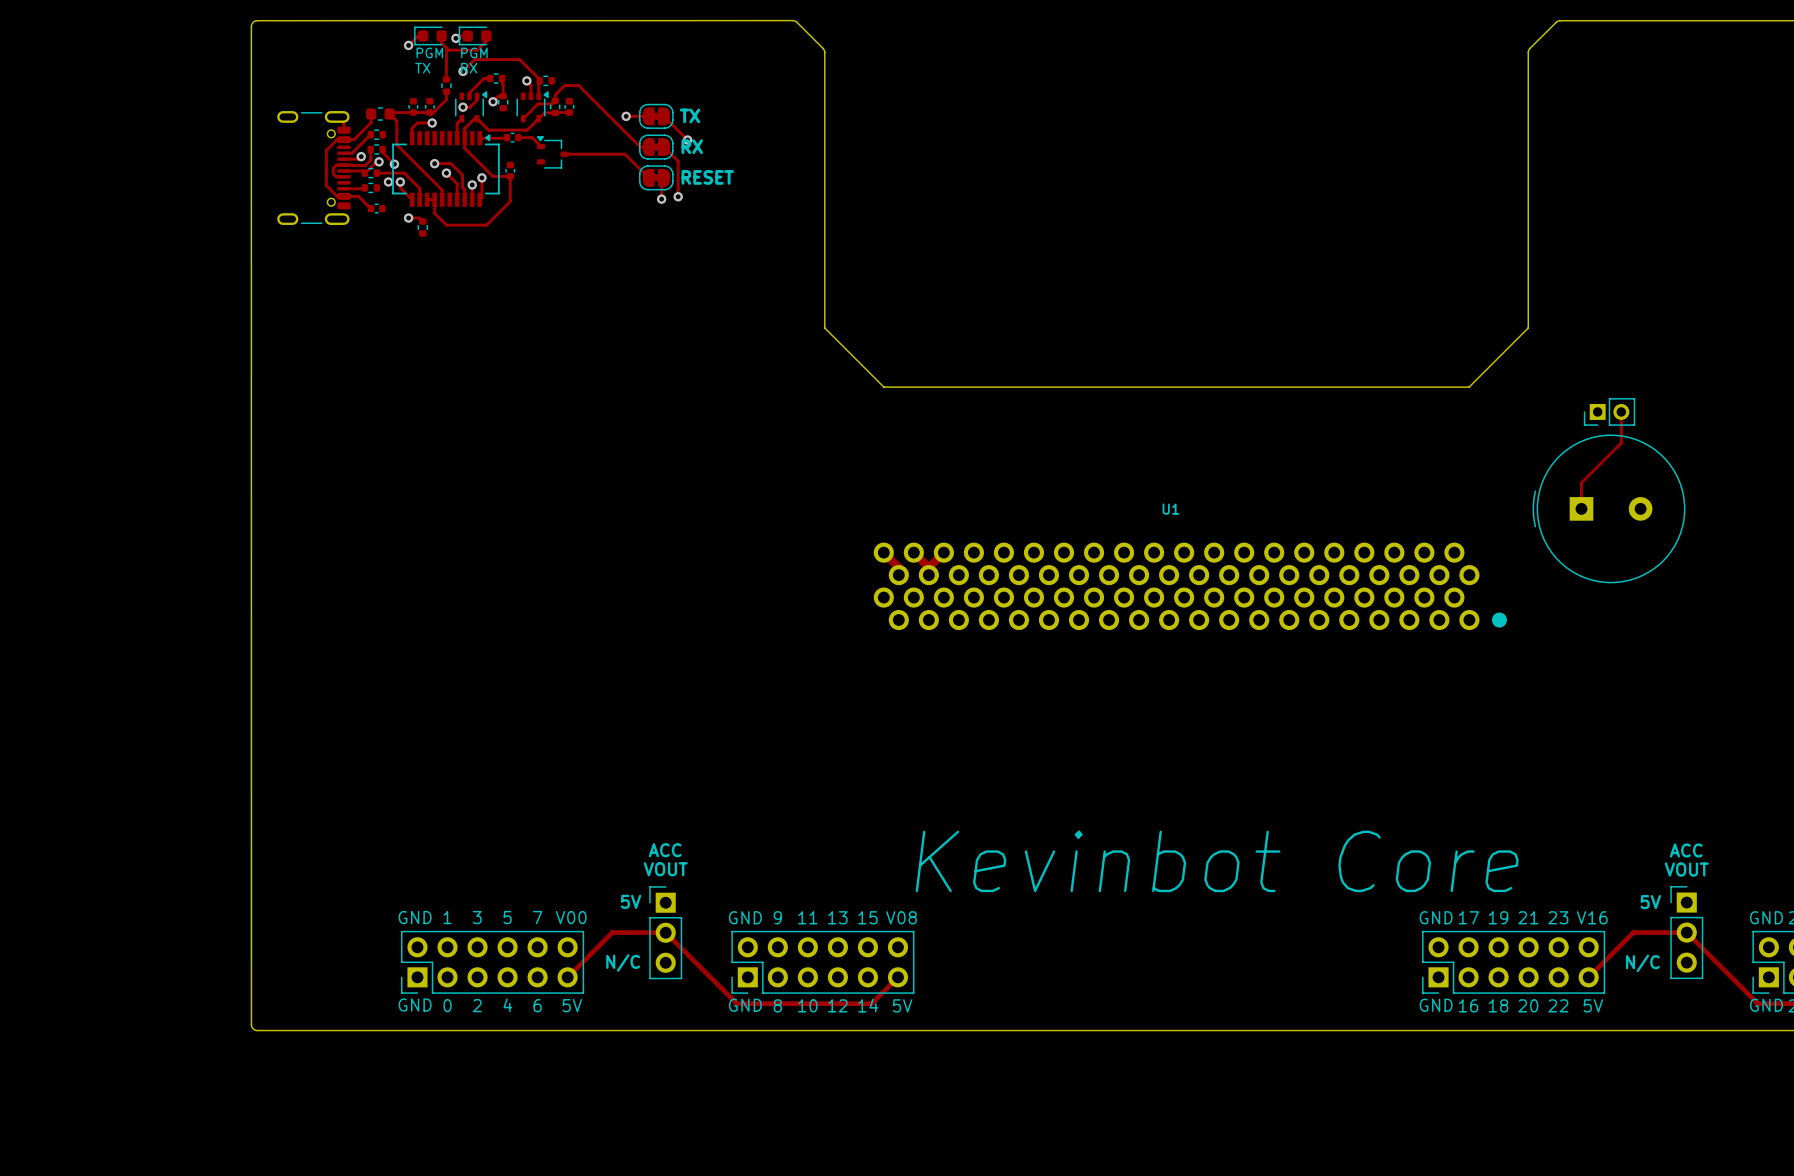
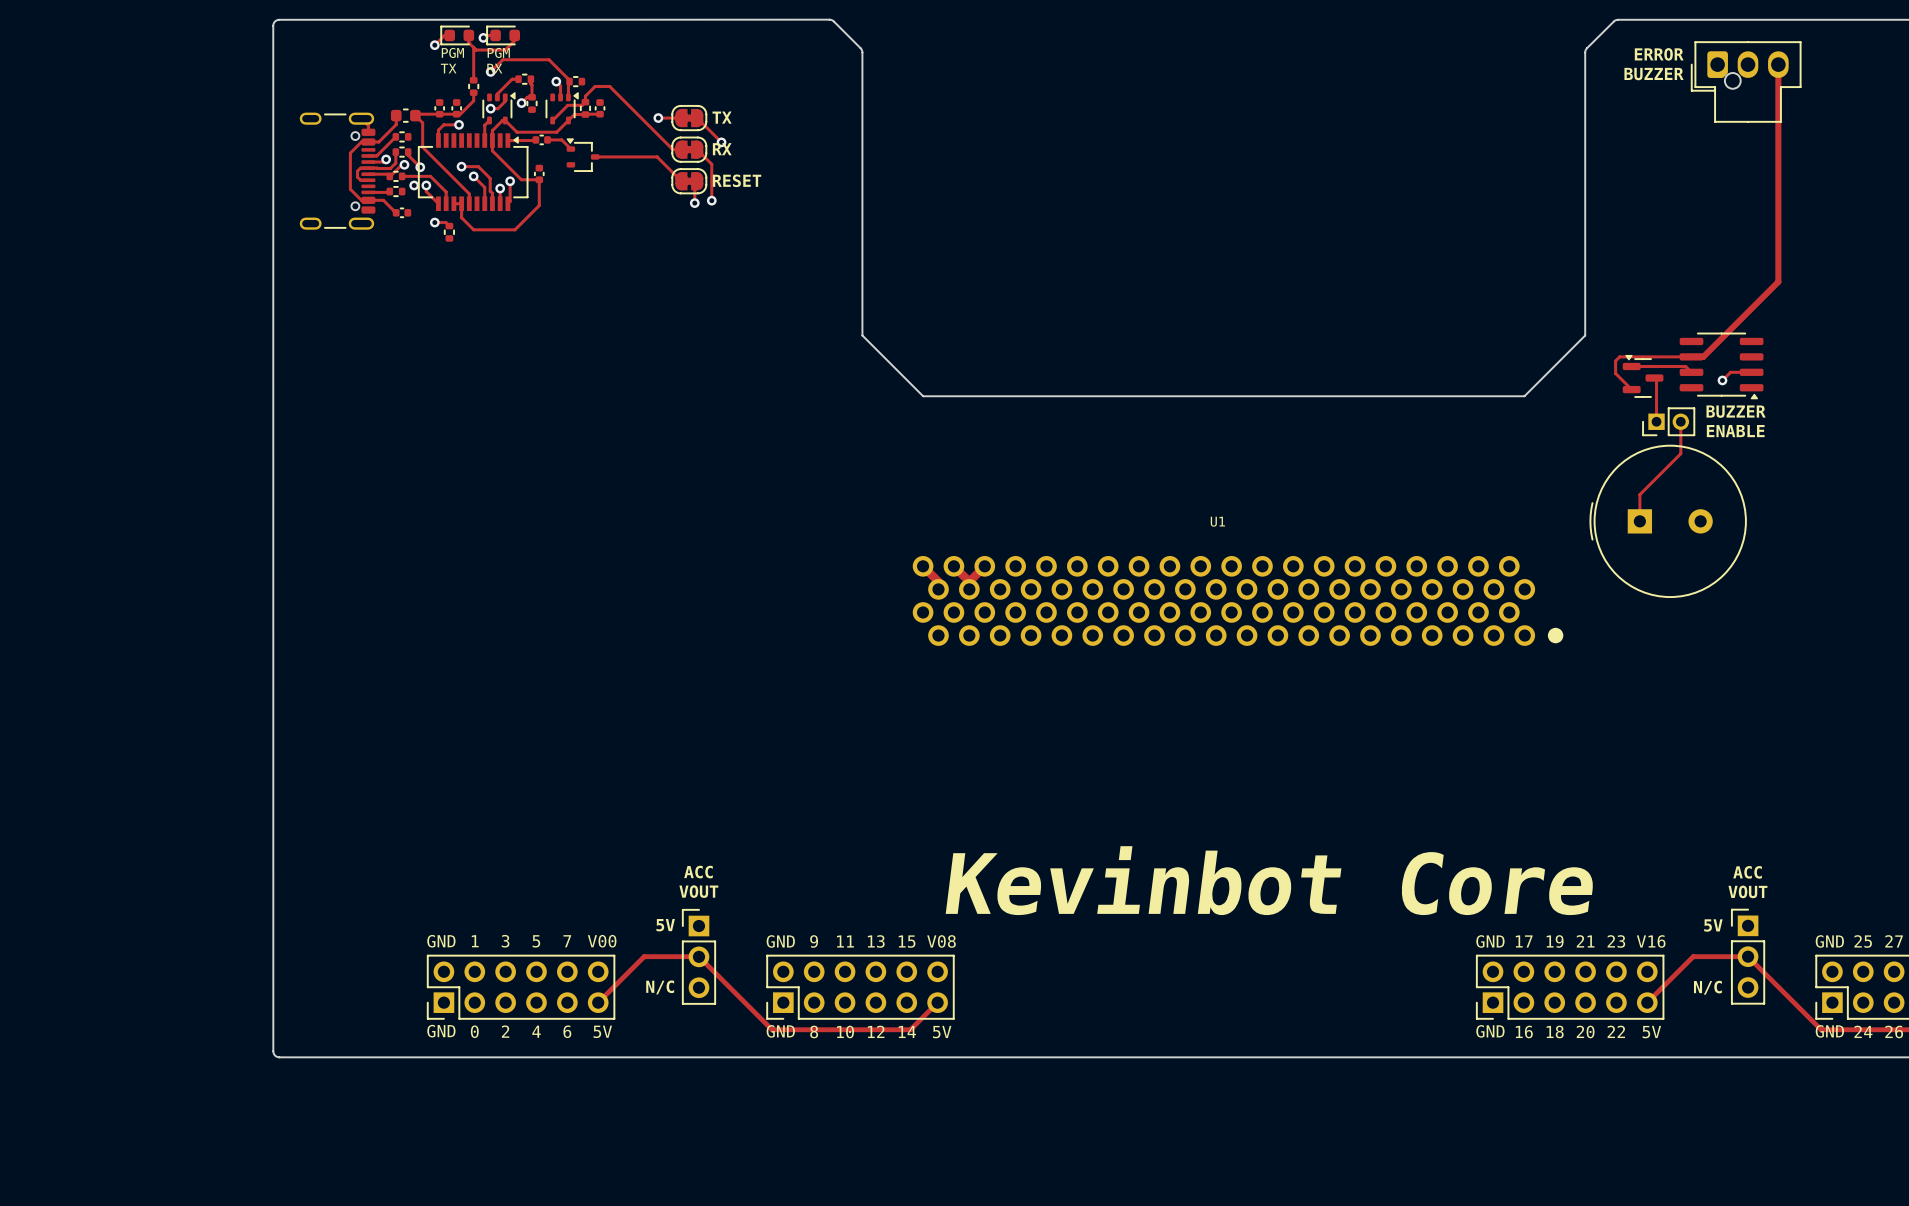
text: none -> ERROR (1659, 54)
track: none -> (1778, 64) (1778, 281) (1703, 356) (1619, 356) (1615, 361) (1615, 373) (1631, 389)
text: none -> BUZZER (1654, 74)
part: none -> (1746, 81)
part: none -> (1721, 366)
track: none -> (1631, 366) (1685, 366) (1691, 372)
track: none -> (1751, 372) (1730, 372) (1722, 380)
part: none -> (1643, 376)
track: none -> (1654, 378) (1656, 380) (1656, 421)
via: none -> (1722, 380)
text: none -> BUZZER (1736, 411)
text: none -> ENABLE (1735, 431)

